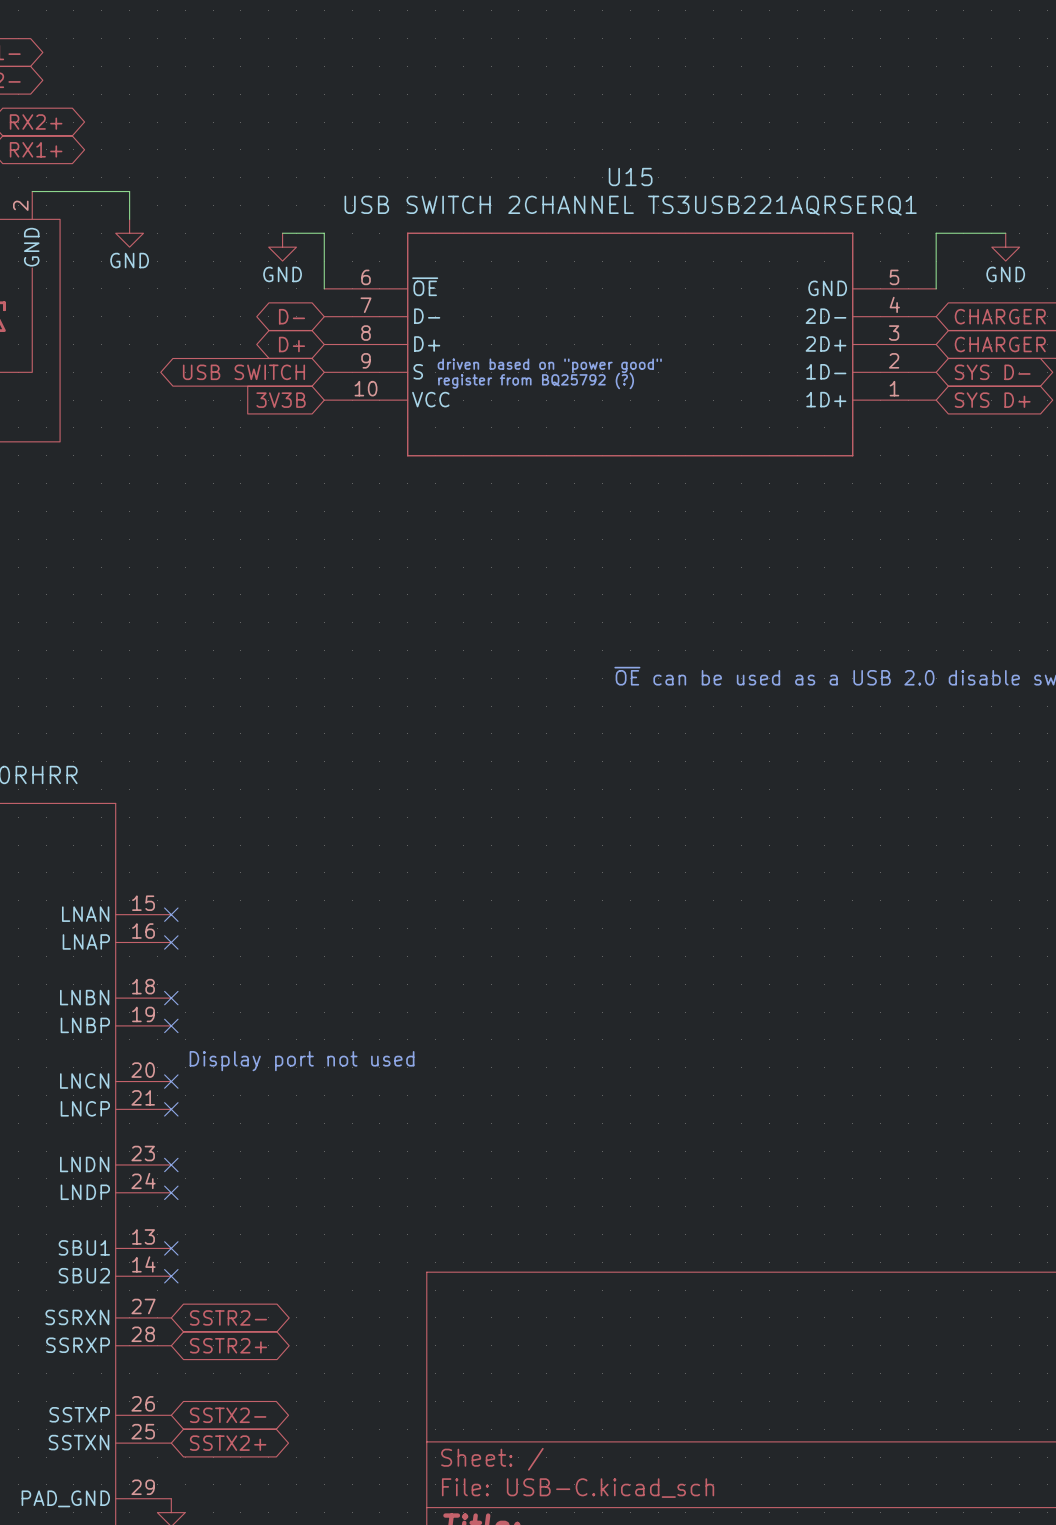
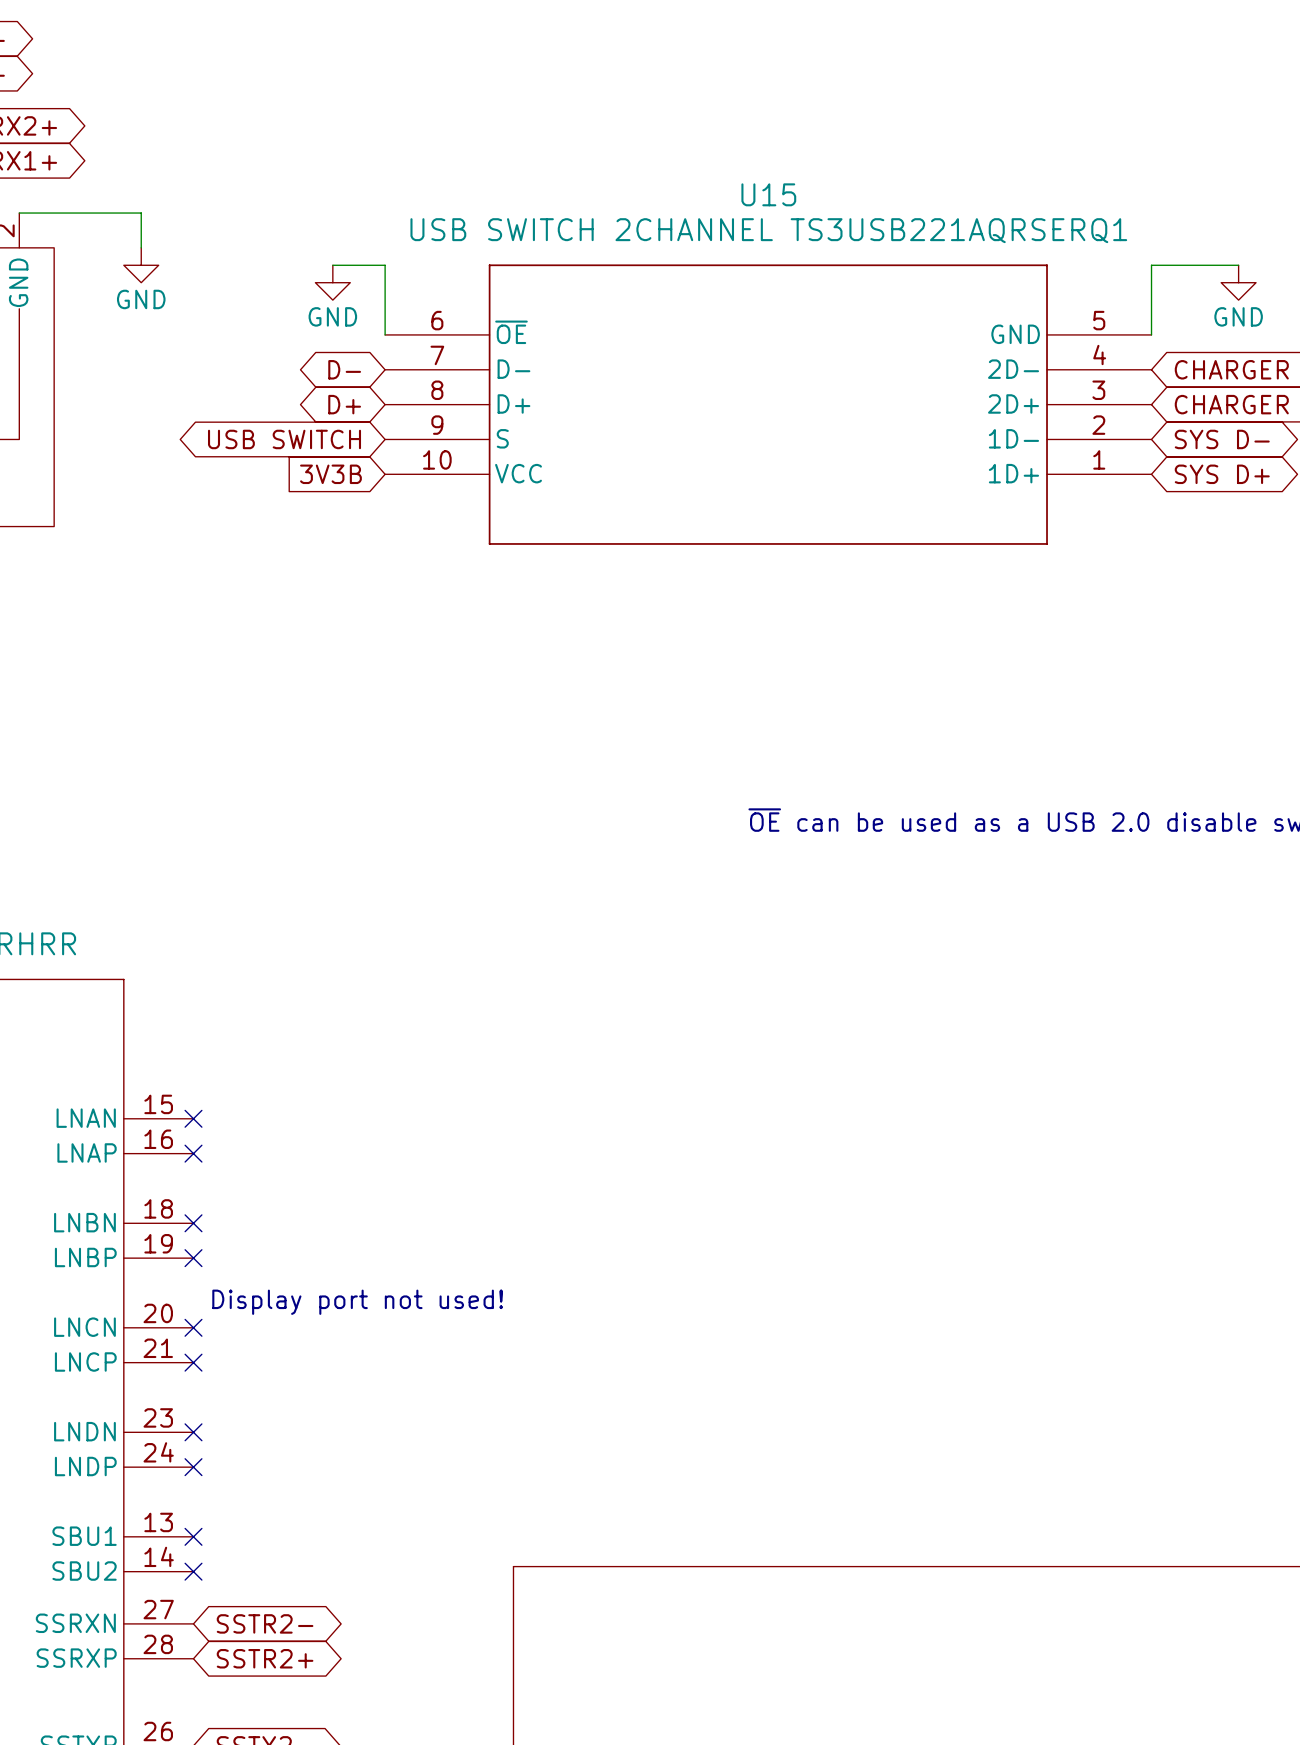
text: driven based on "power good" (549, 365) -> none
text: register from BQ25792 (?) (536, 380) -> none
text: Display port not used (302, 1061) -> Display port not used! (357, 1302)

